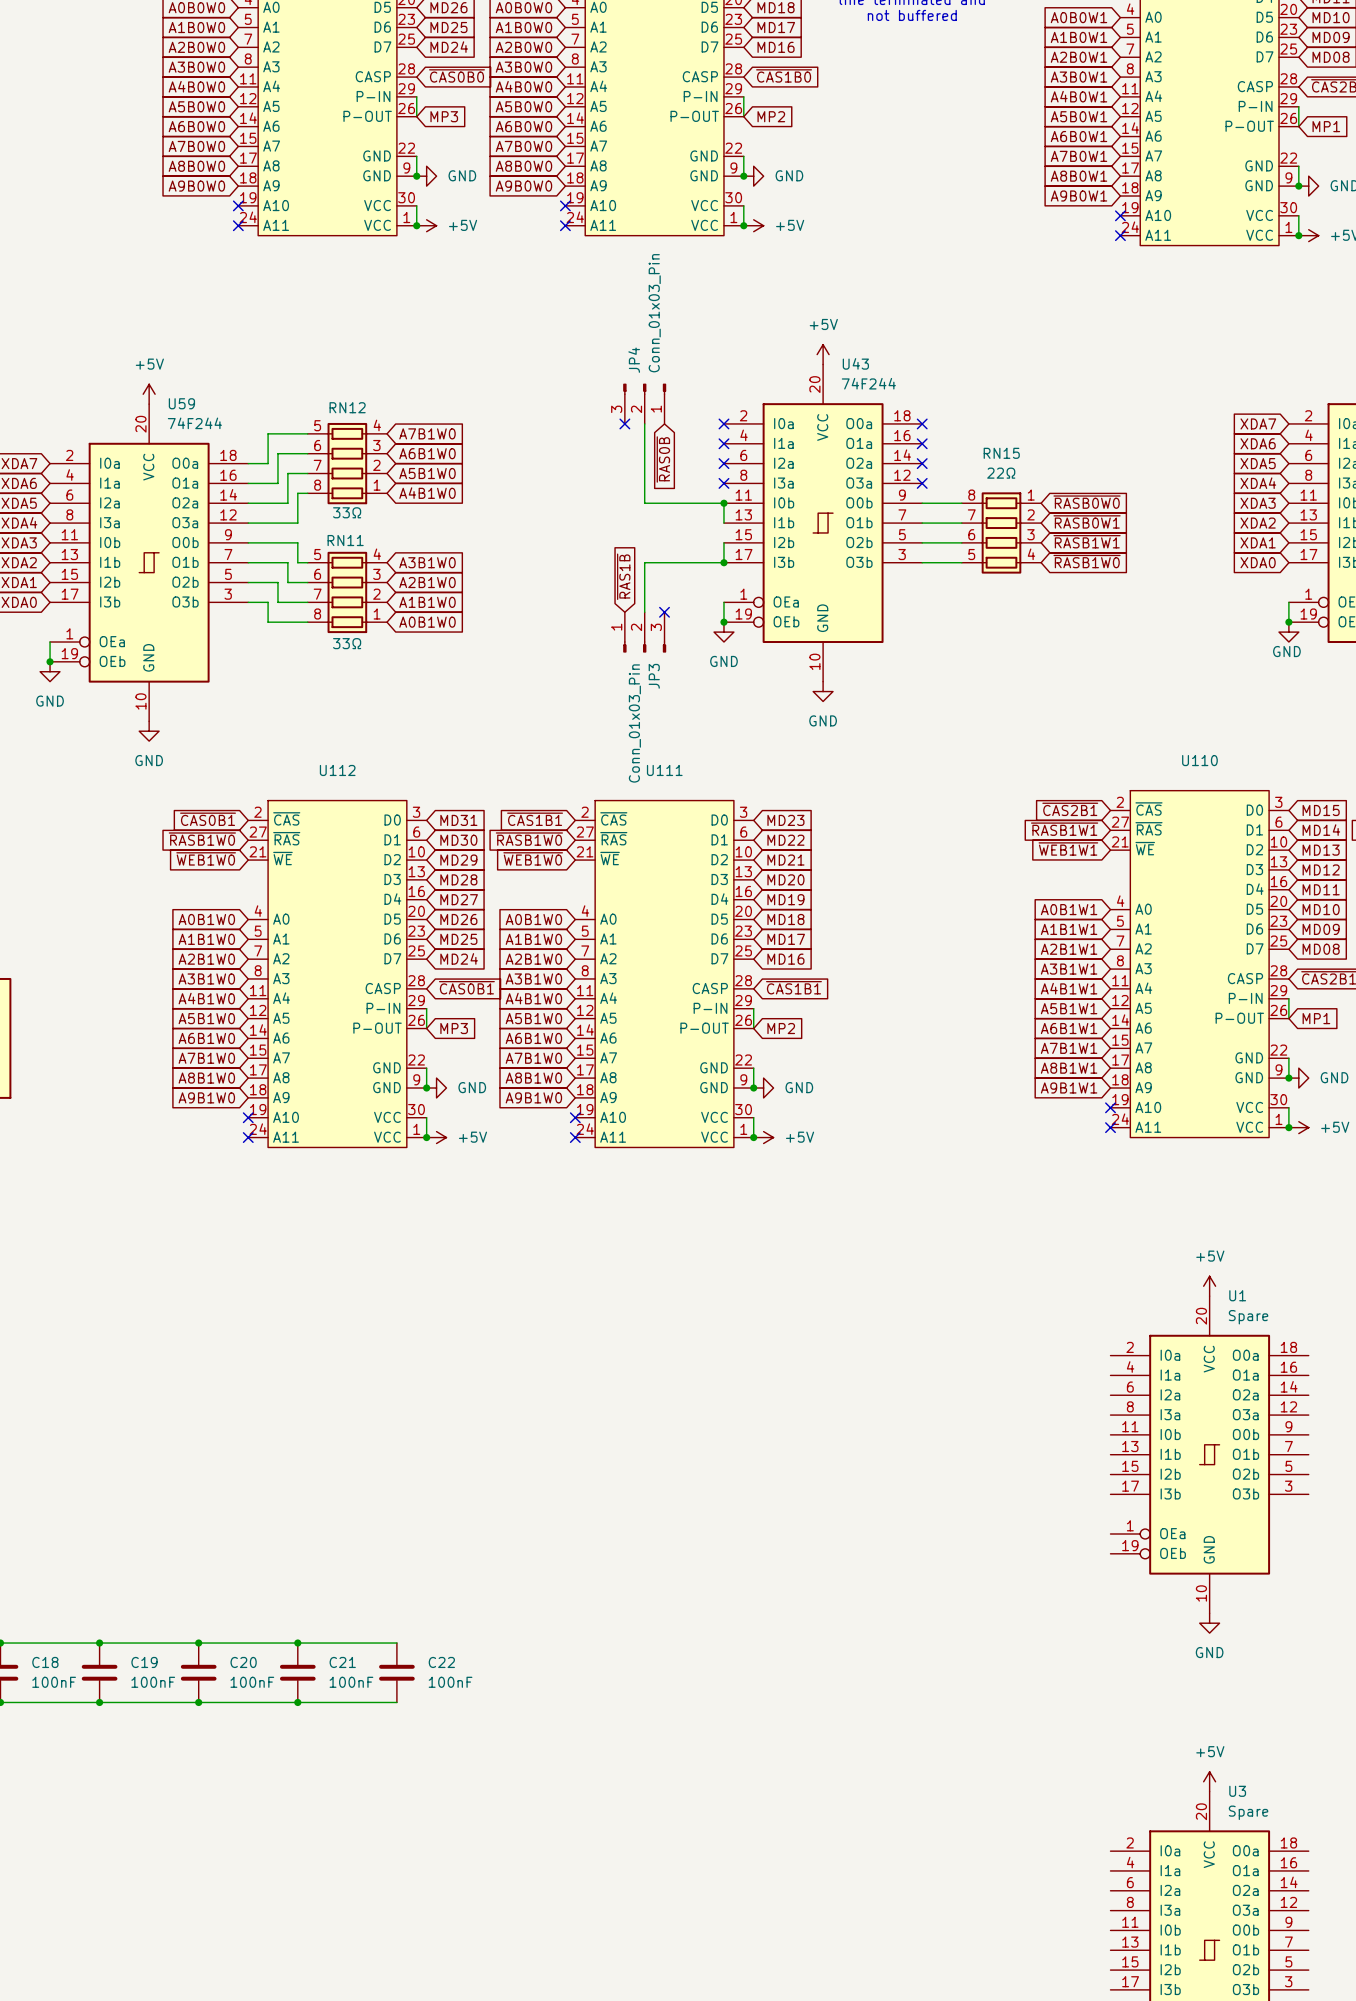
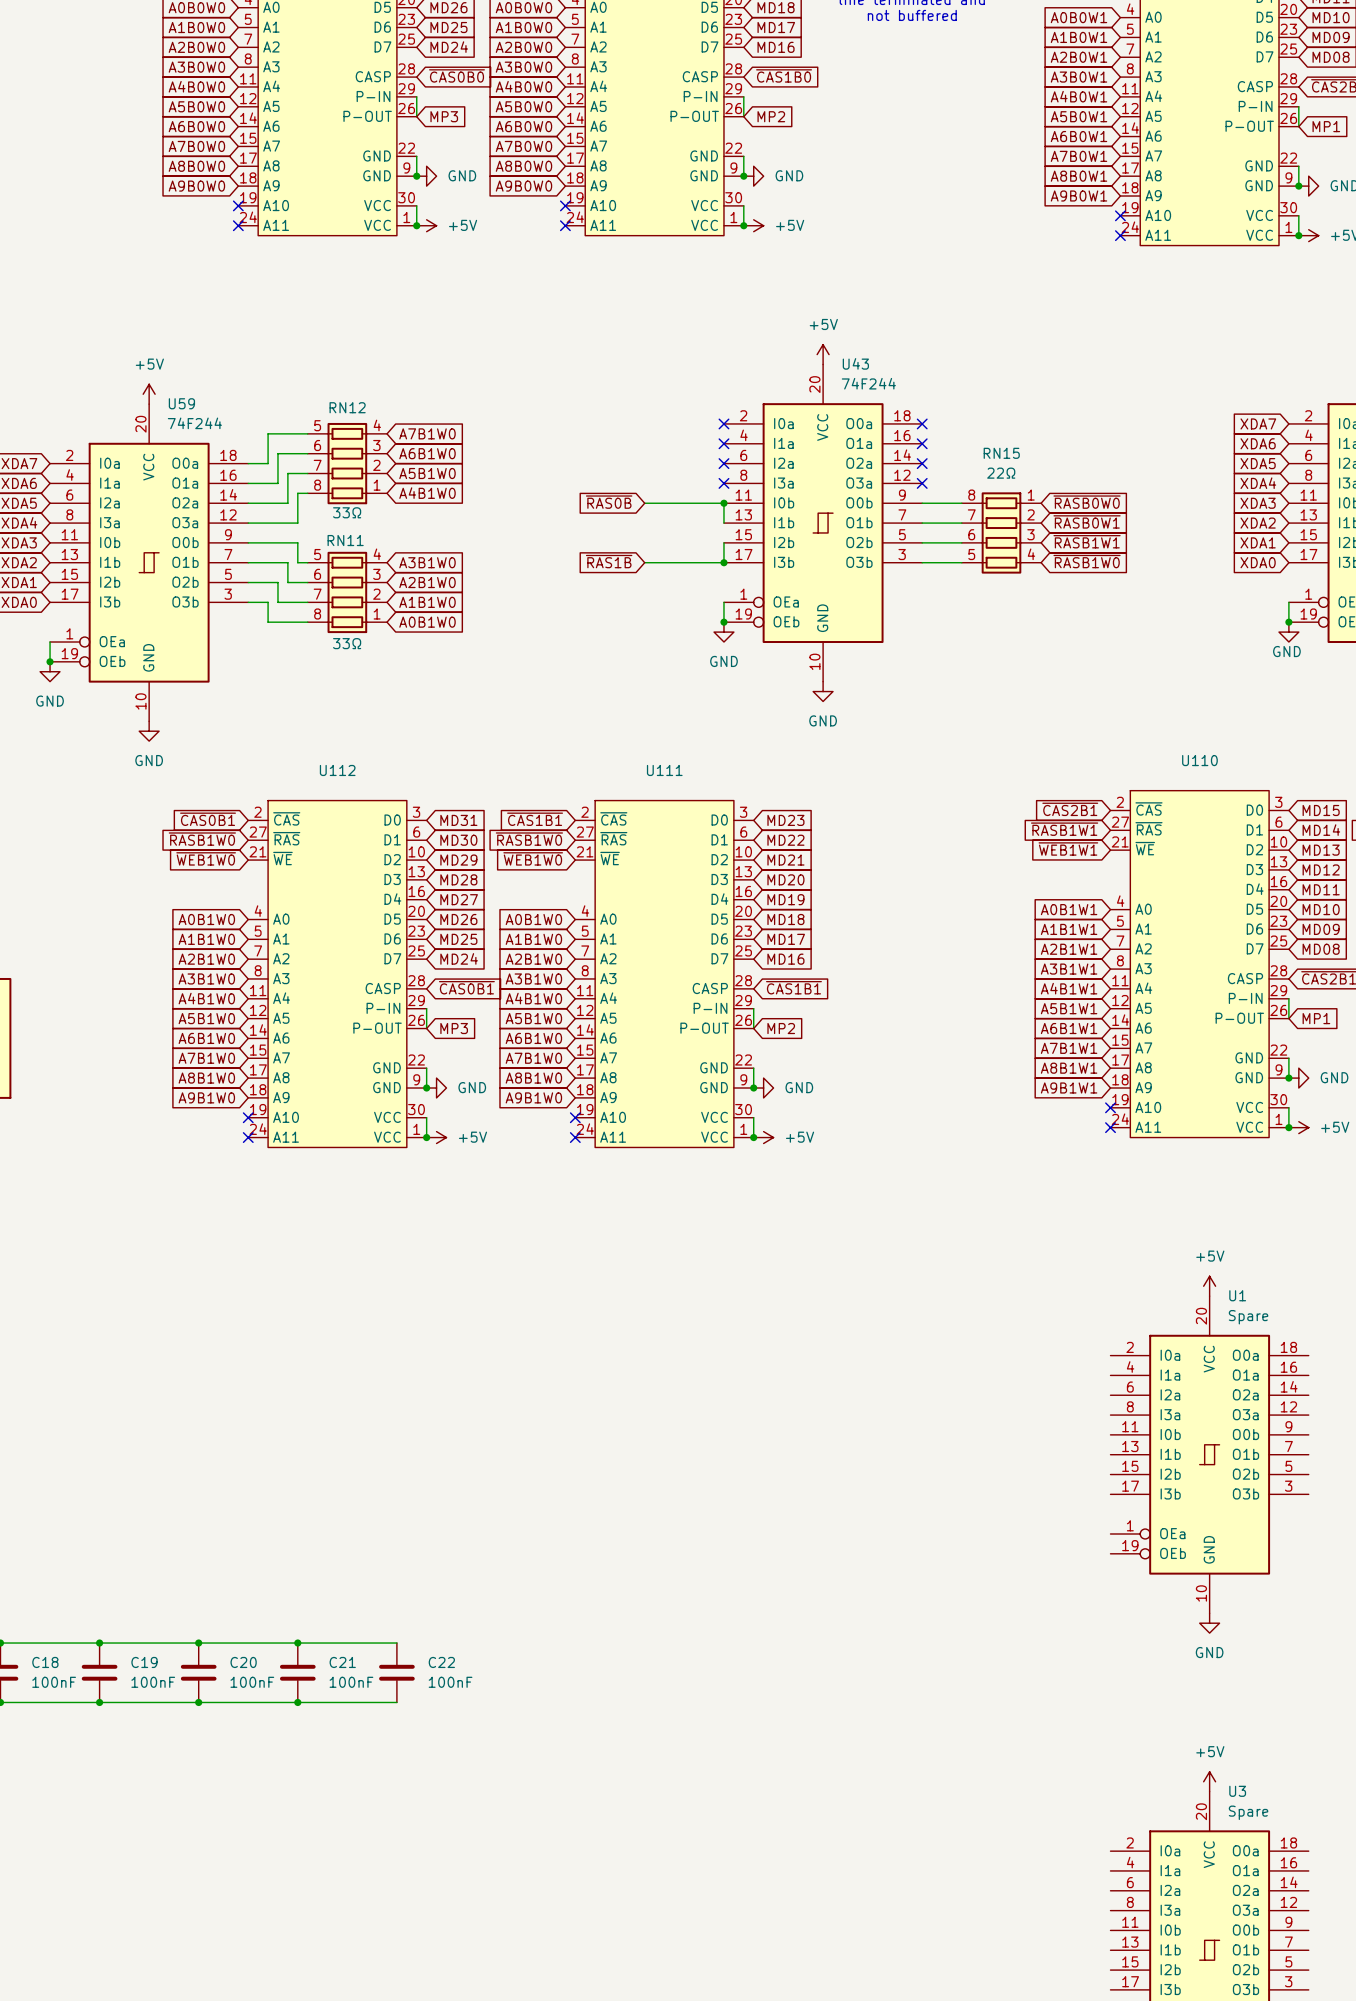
JP4: Conn_01x03_Pin (644, 403) -> none
no-connect mark: (624, 423) -> none
wire: (644, 423) (644, 503) -> none
global label rotation: 0° (663, 459) -> 90° clockwise (609, 502)
wire: (644, 562) (644, 612) -> none
global label rotation: 0° (623, 576) -> 90° counterclockwise (609, 561)
no-connect mark: (664, 612) -> none
JP3: Conn_01x03_Pin (644, 632) -> none

